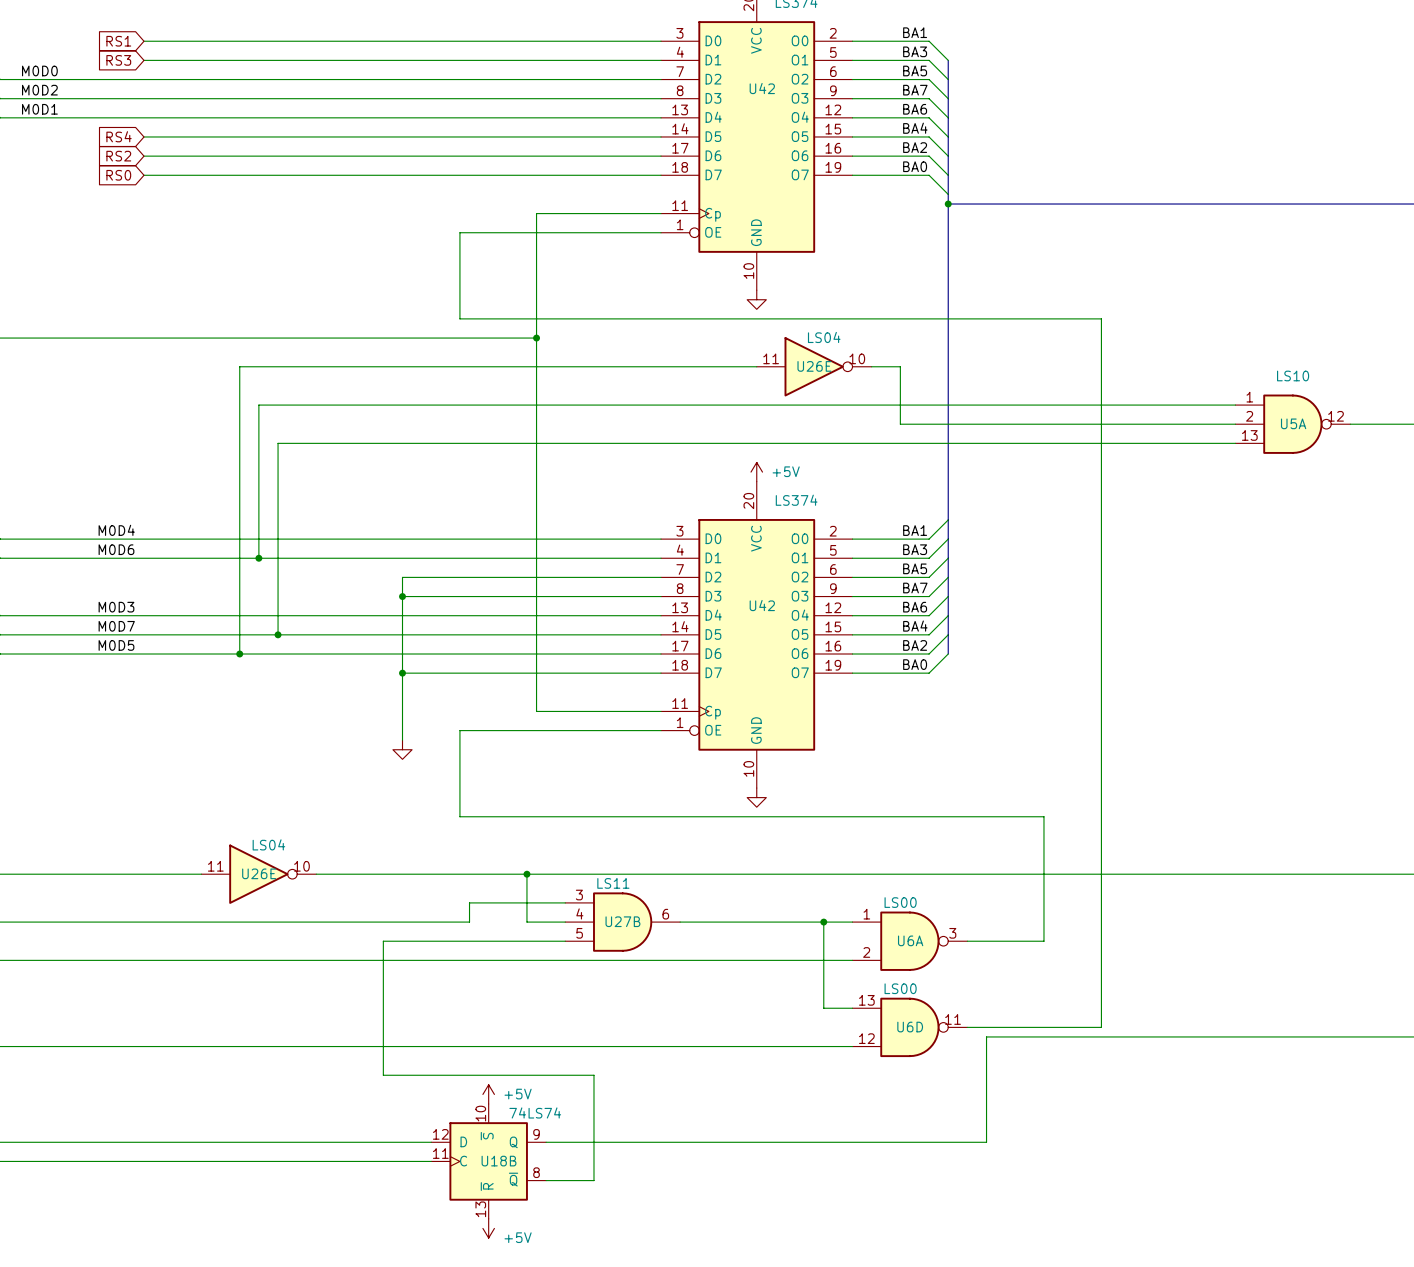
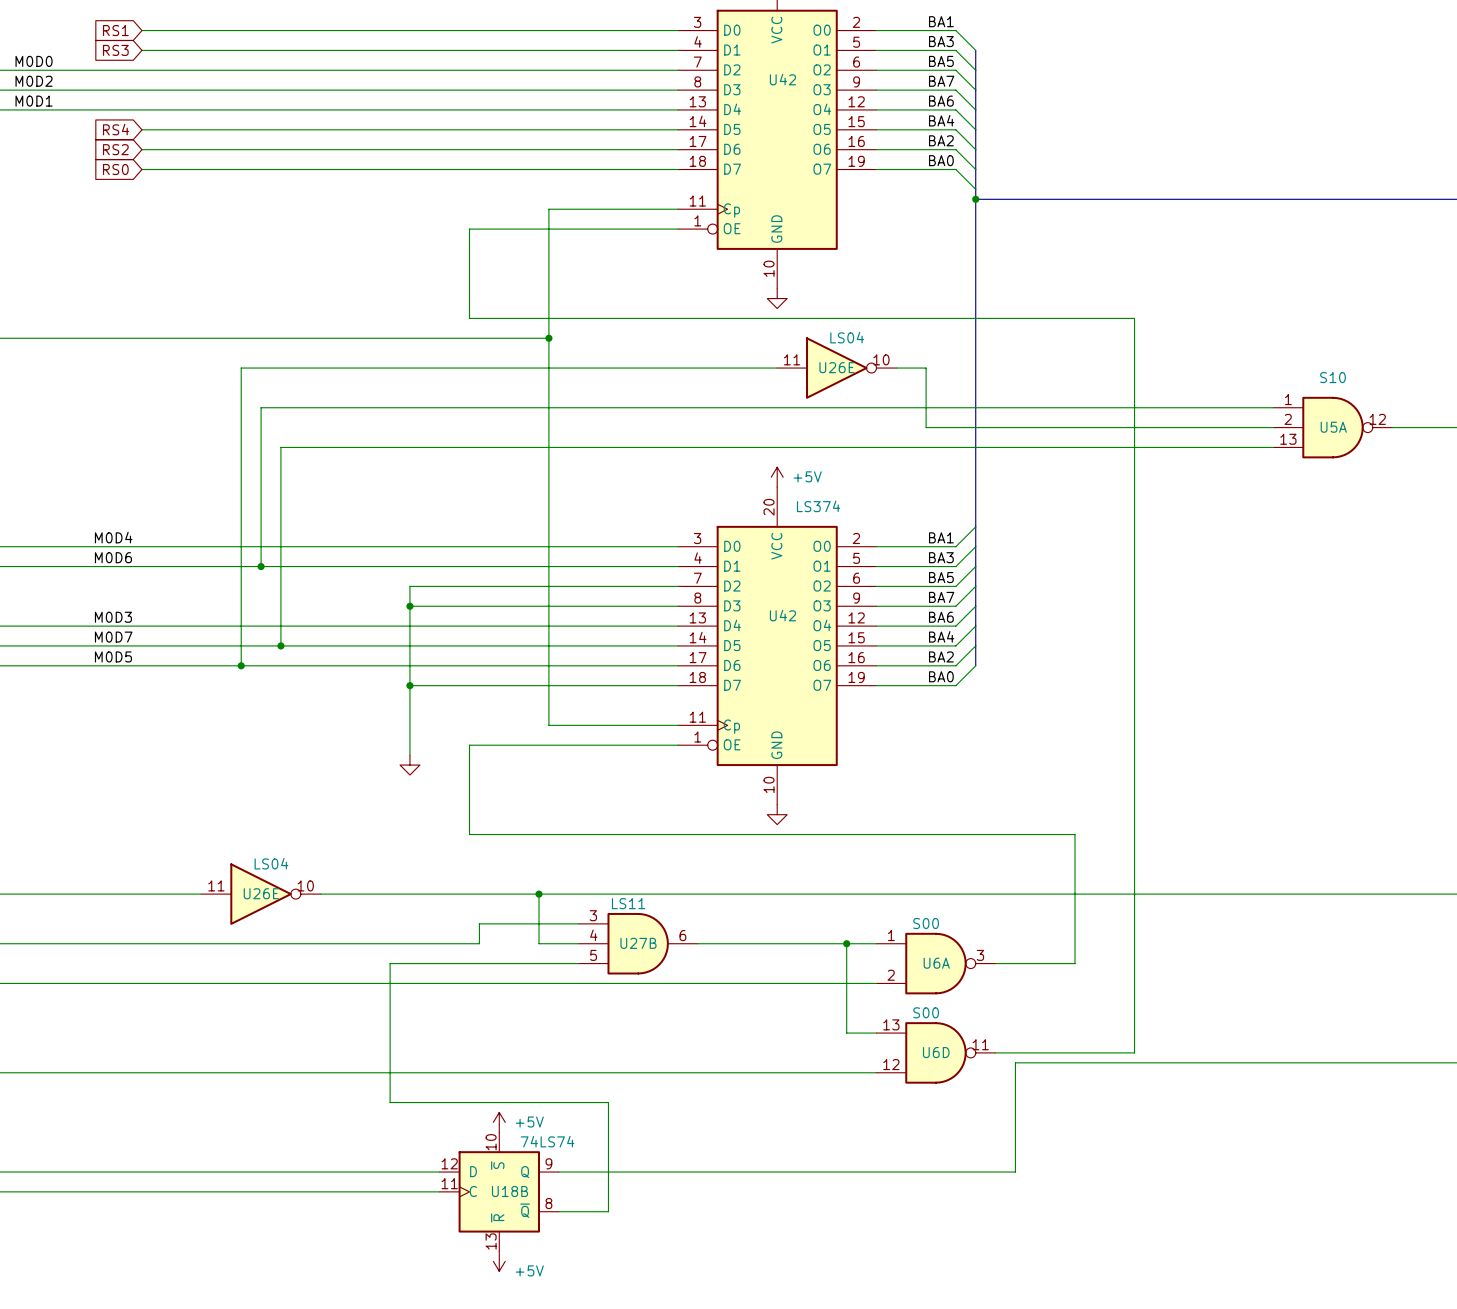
U5A value: LS10 (1293, 375) -> S10 (1332, 377)
U6A value: LS00 (900, 902) -> S00 (926, 923)
U6D value: LS00 (900, 988) -> S00 (926, 1012)

